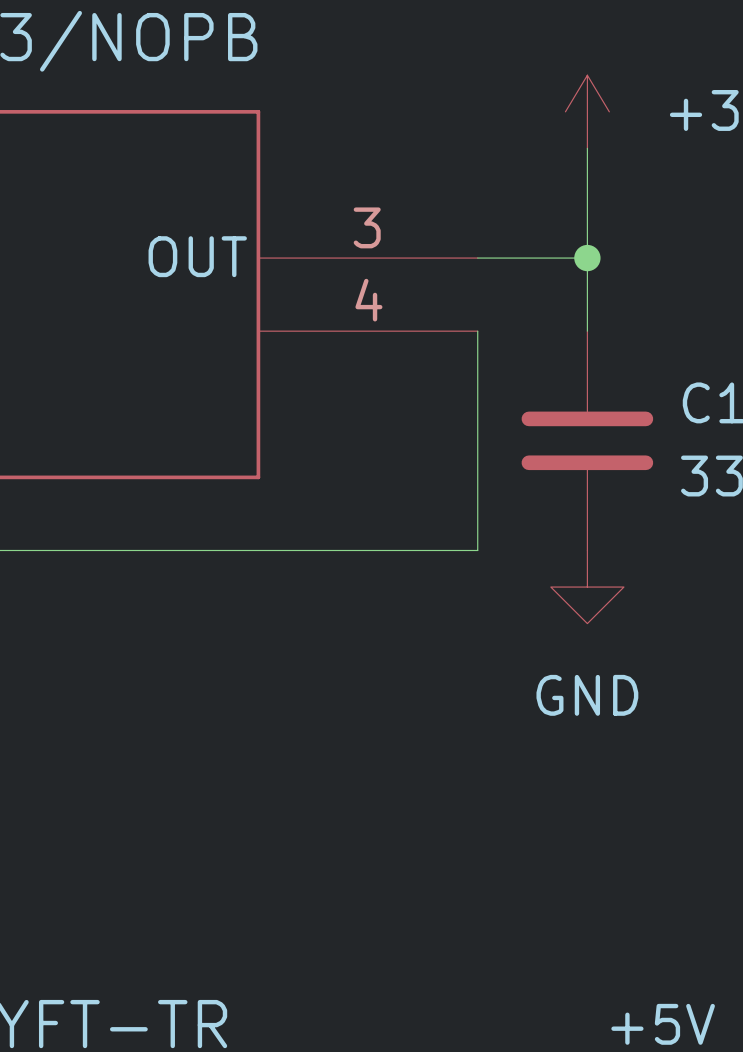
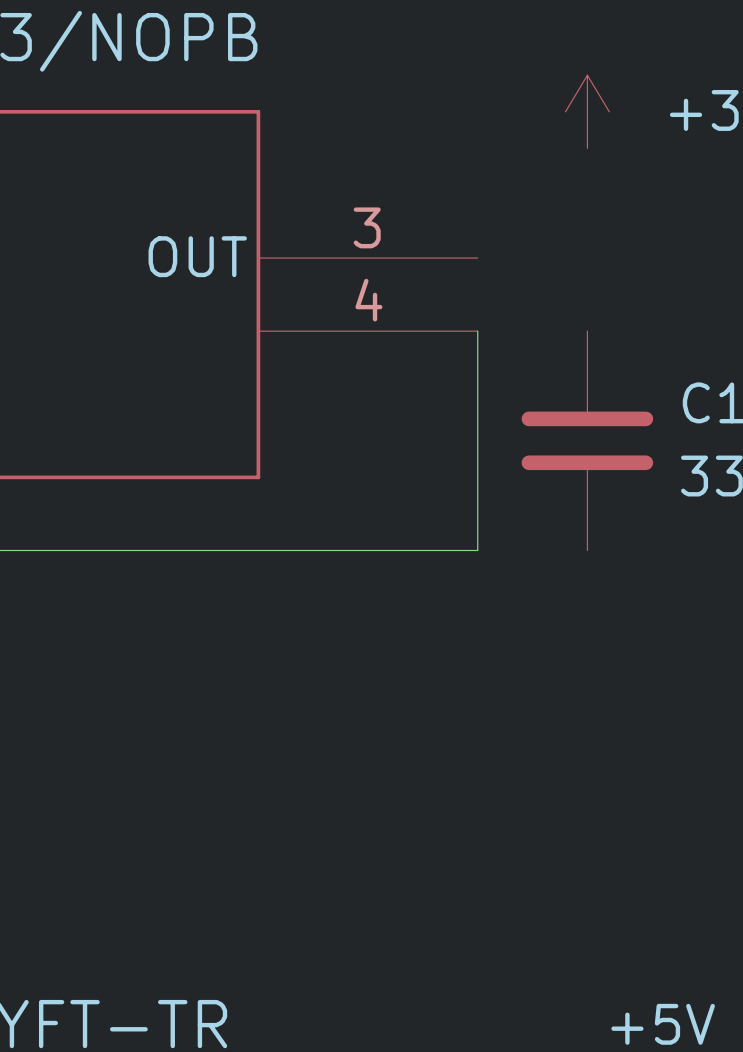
wire: (587, 148) (587, 331) -> none
wire: (477, 258) (587, 258) -> none
junction: (587, 258) -> none
power symbol: GND (587, 587) -> none

